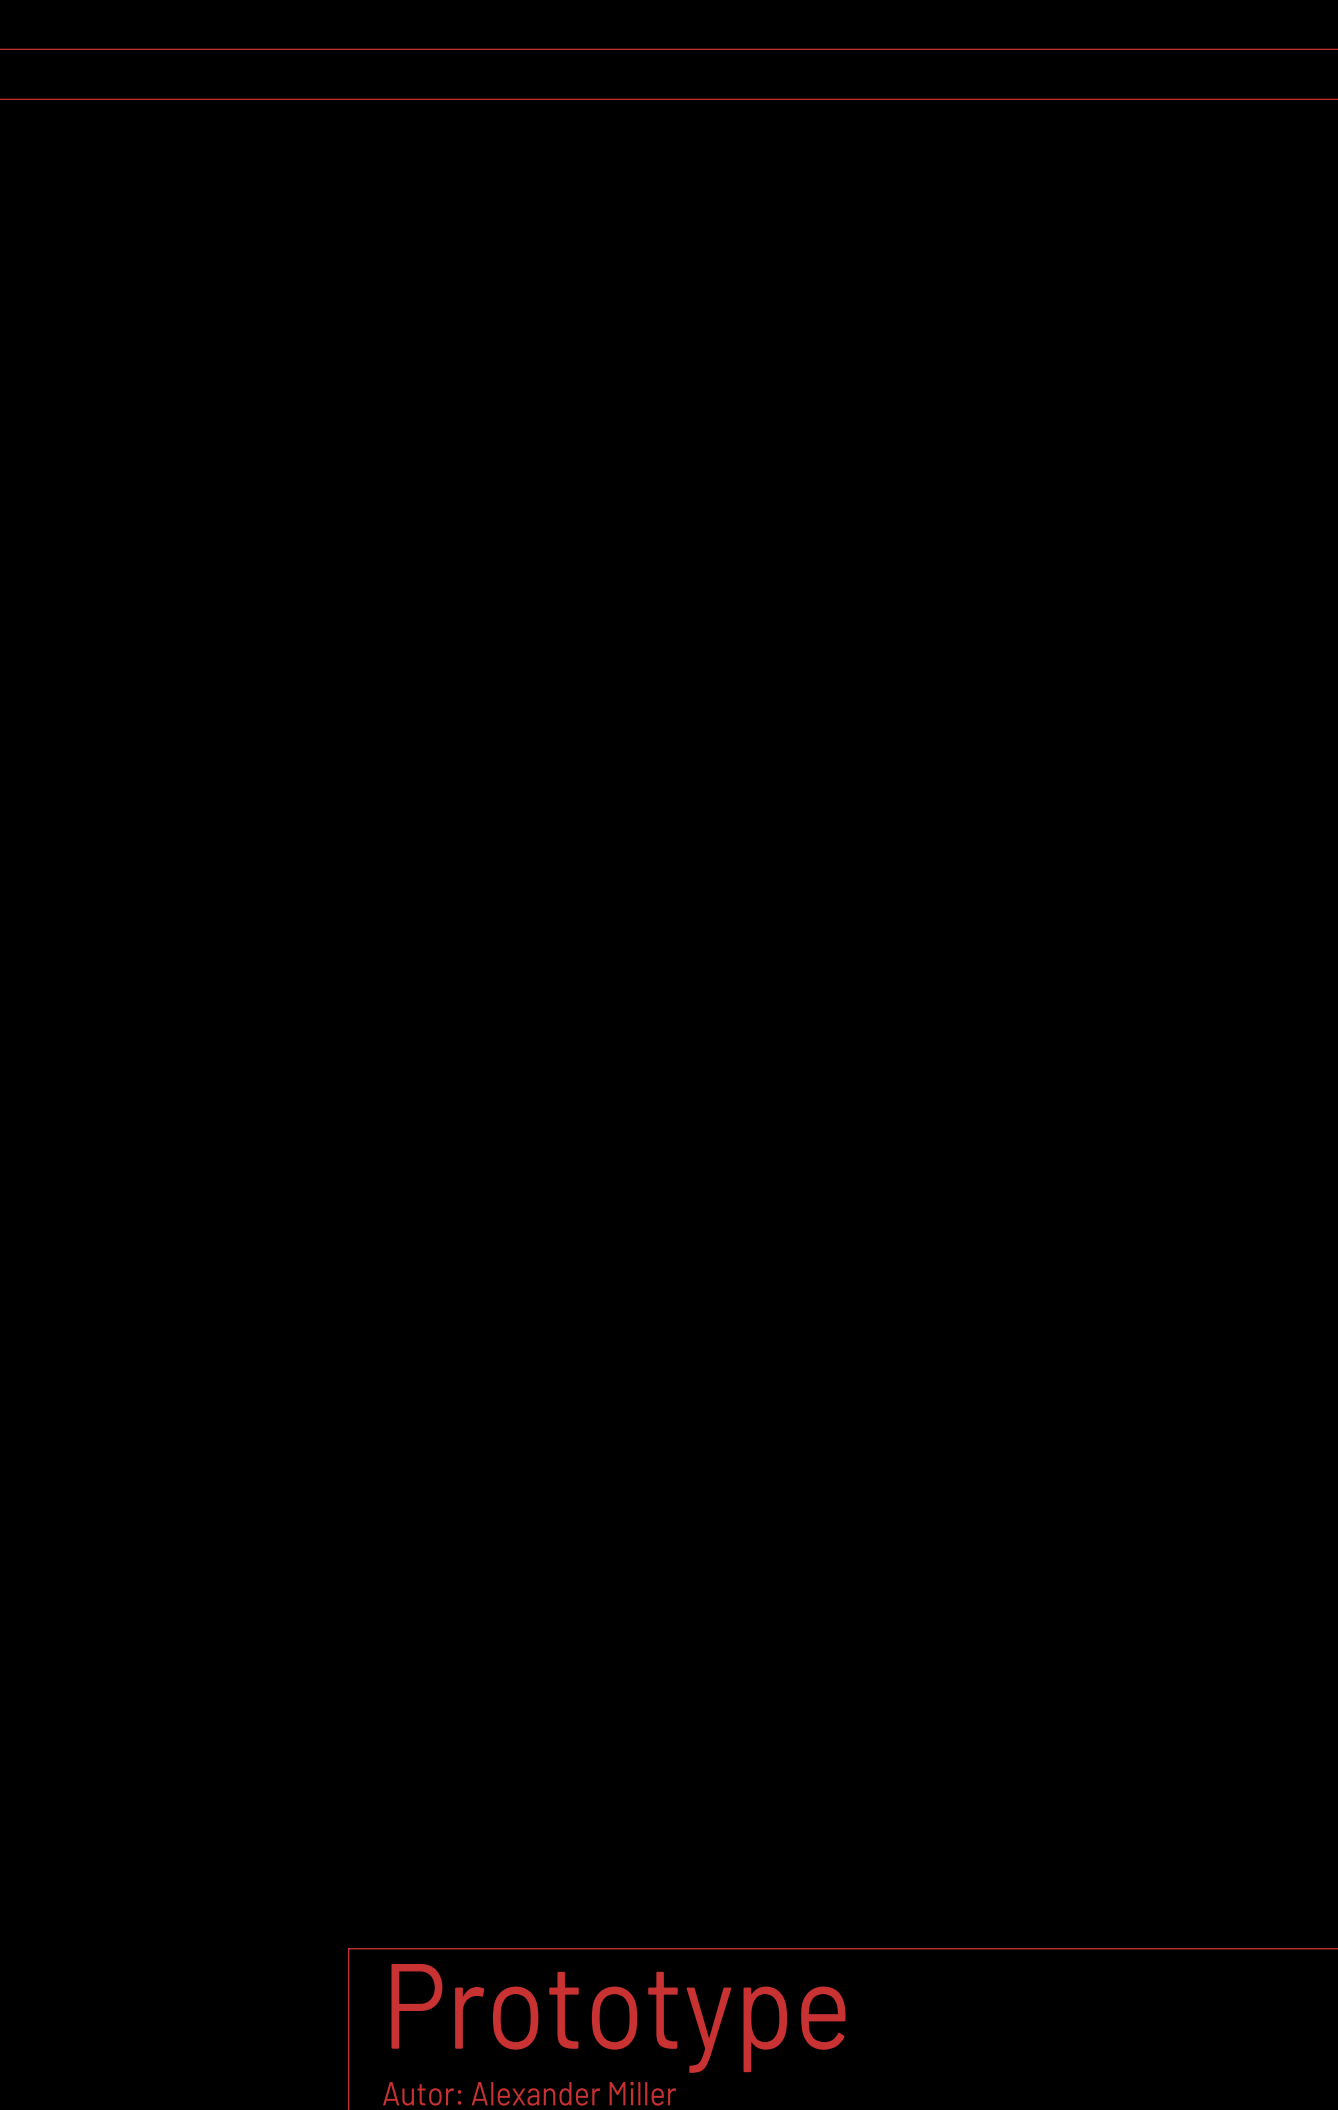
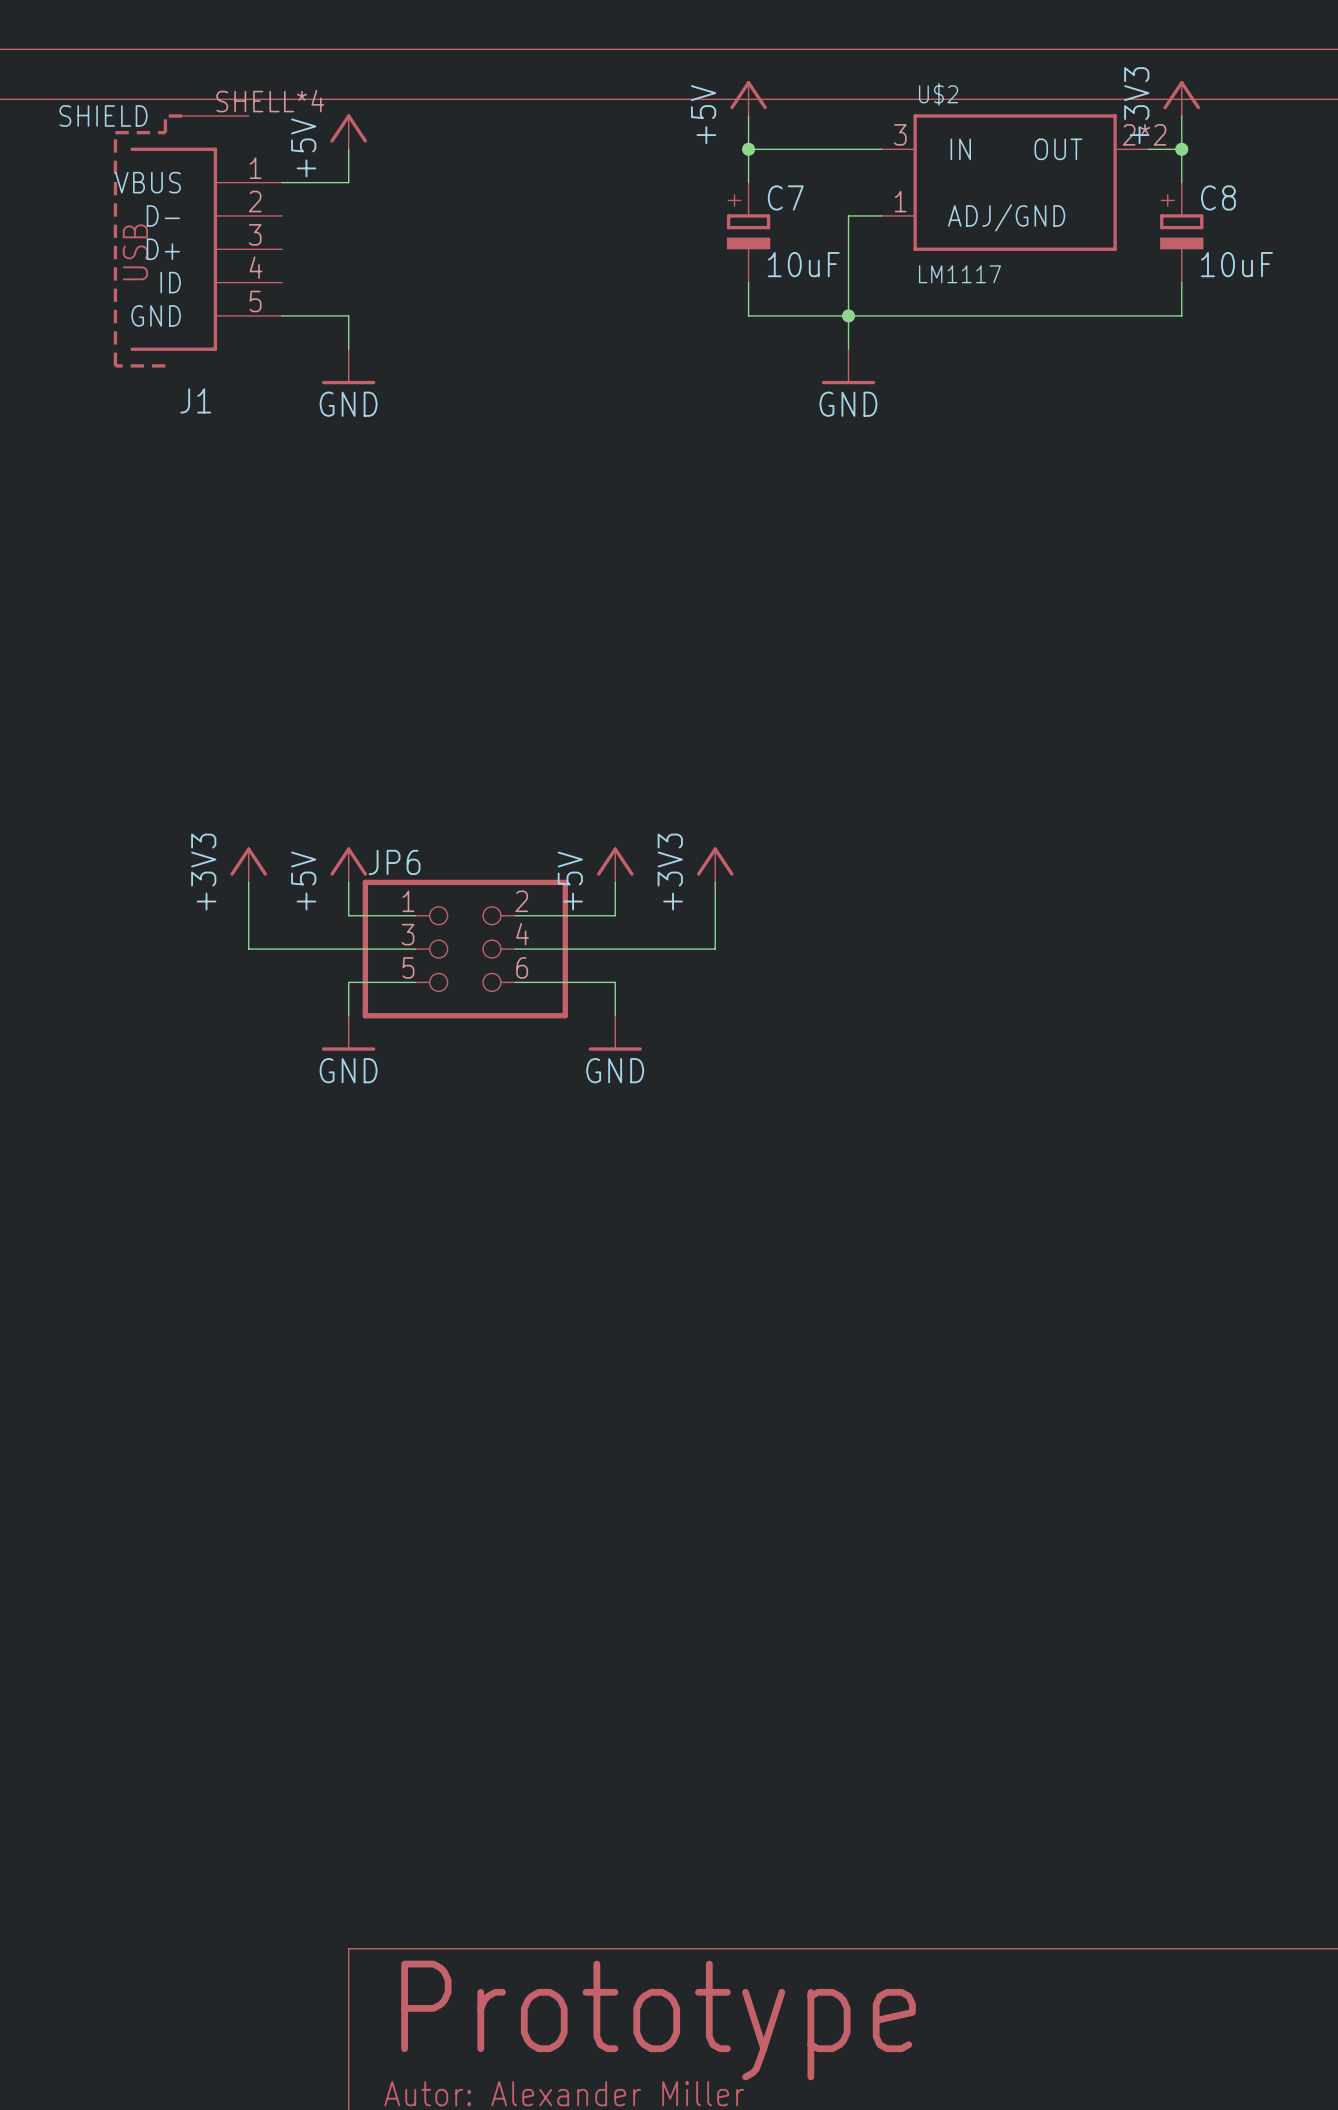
power symbol: none -> +5V (748, 98)
power symbol: none -> +3V3 (1181, 98)
wire: none -> (748, 115) (748, 182)
wire: none -> (1181, 115) (1181, 182)
power symbol: none -> +5V (348, 131)
wire: none -> (348, 149) (348, 182) (282, 182)
wire: none -> (748, 149) (881, 149)
junction: none -> (748, 149)
wire: none -> (1148, 149) (1181, 149)
junction: none -> (1181, 149)
U$2: none -> LM1117 (1015, 182)
wire: none -> (881, 215) (848, 215) (848, 349)
C7: none -> 10uF (748, 232)
C8: none -> 10uF (1181, 232)
J1: none -> (197, 240)
wire: none -> (748, 282) (748, 315) (1181, 315) (1181, 282)
wire: none -> (282, 315) (348, 315) (348, 349)
junction: none -> (848, 315)
power symbol: none -> GND (348, 366)
power symbol: none -> GND (848, 366)
power symbol: none -> +3V3 (248, 864)
power symbol: none -> +5V (348, 864)
power symbol: none -> +5V (615, 864)
power symbol: none -> +3V3 (715, 864)
wire: none -> (248, 882) (248, 949) (415, 949)
wire: none -> (348, 882) (348, 915) (415, 915)
wire: none -> (615, 882) (615, 915) (515, 915)
wire: none -> (715, 882) (715, 949) (515, 949)
JP6: none -> (465, 949)
wire: none -> (415, 982) (348, 982) (348, 1015)
wire: none -> (515, 982) (615, 982) (615, 1015)
power symbol: none -> GND (348, 1033)
power symbol: none -> GND (615, 1033)

